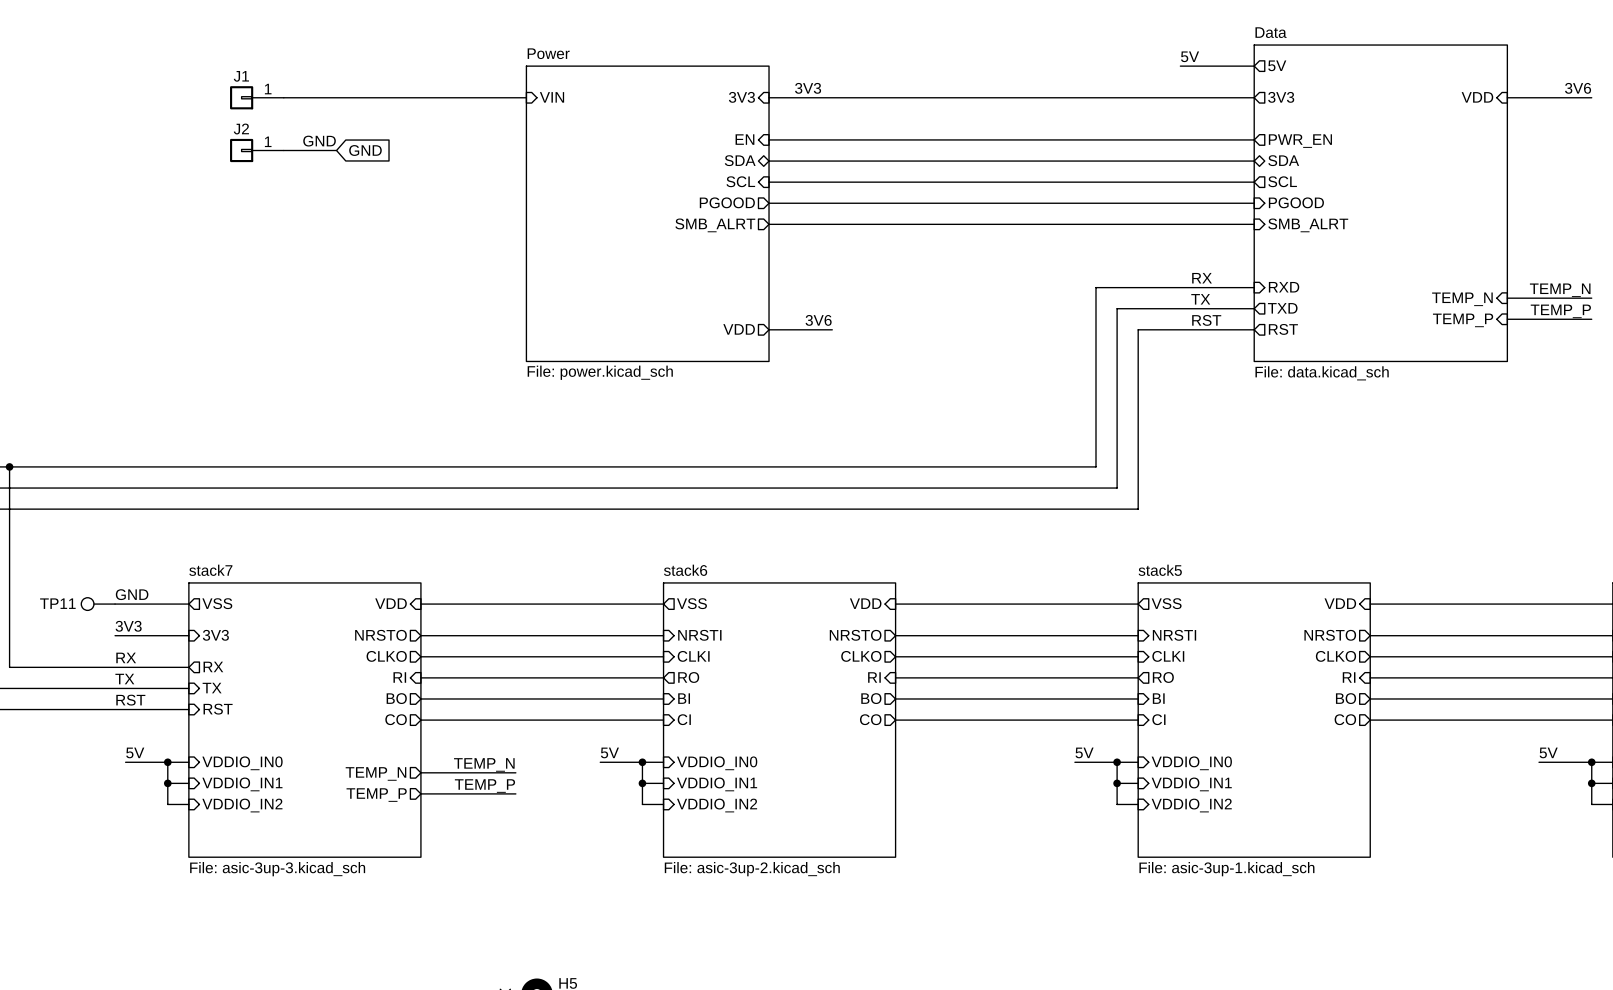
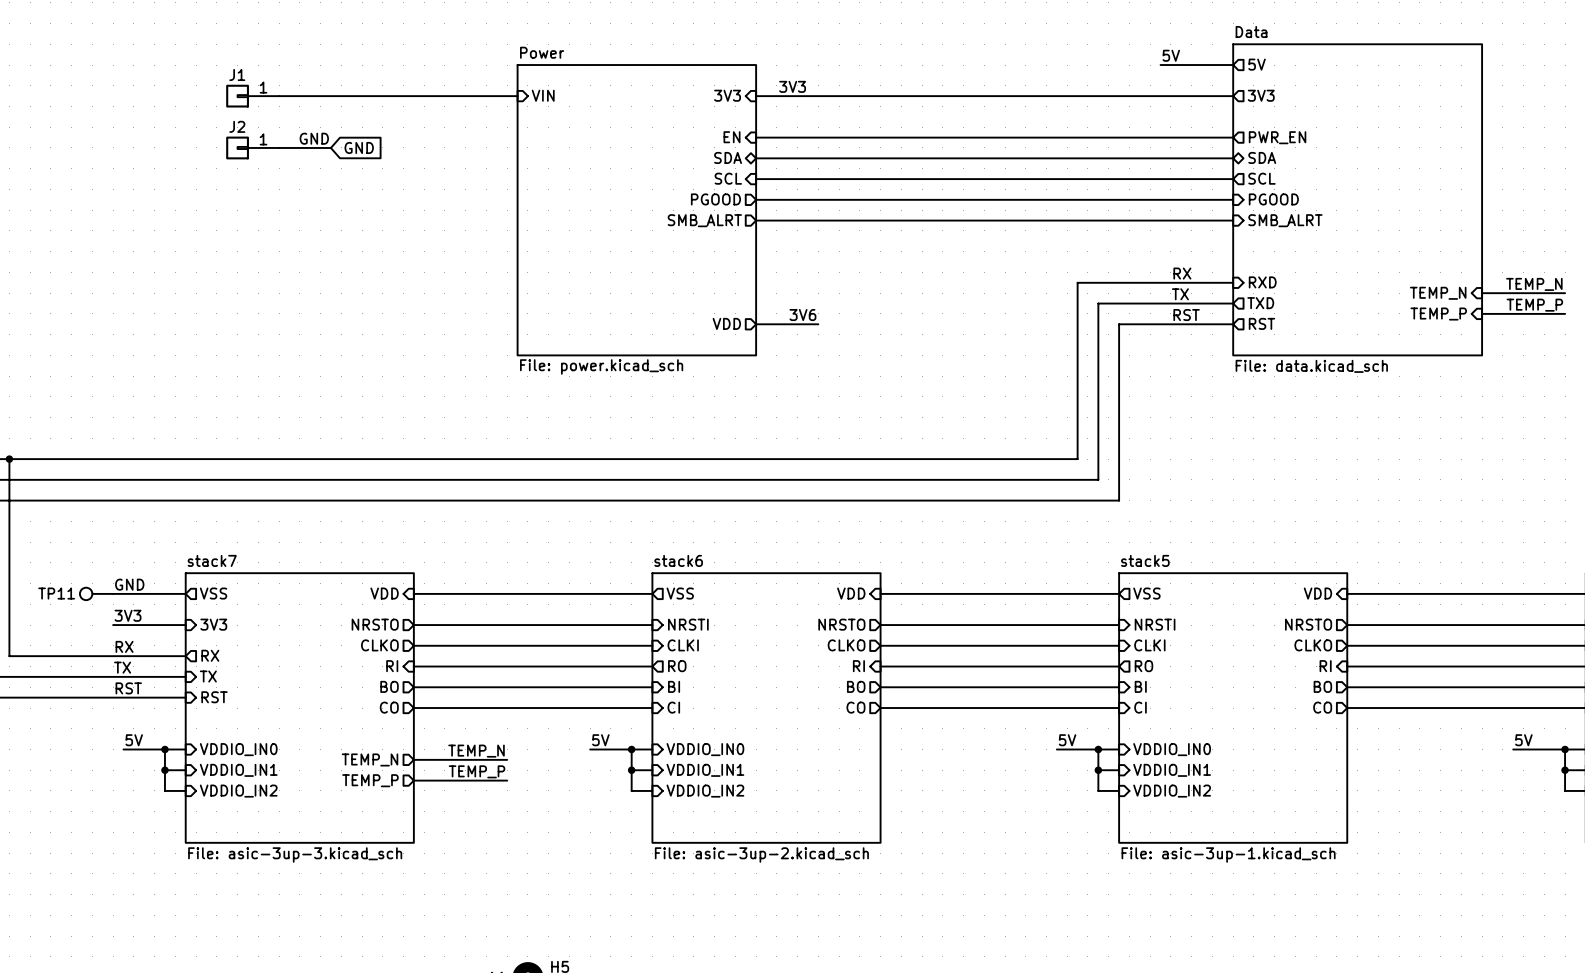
label: 3V6 (1578, 88) -> none
sheet pin: VDD (1477, 97) -> none
wire: (1507, 97) (1591, 97) -> none

